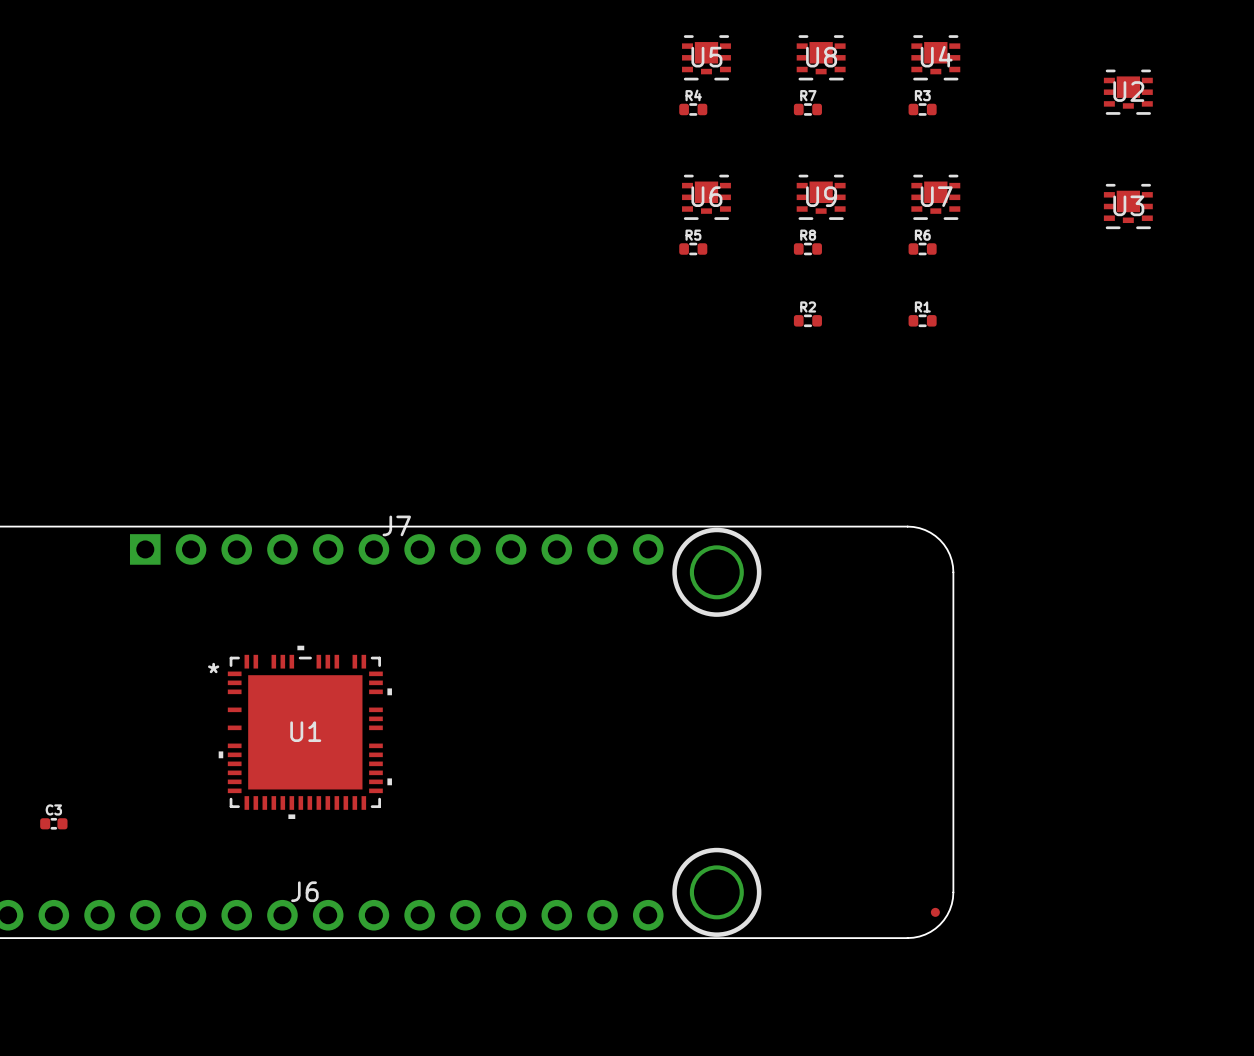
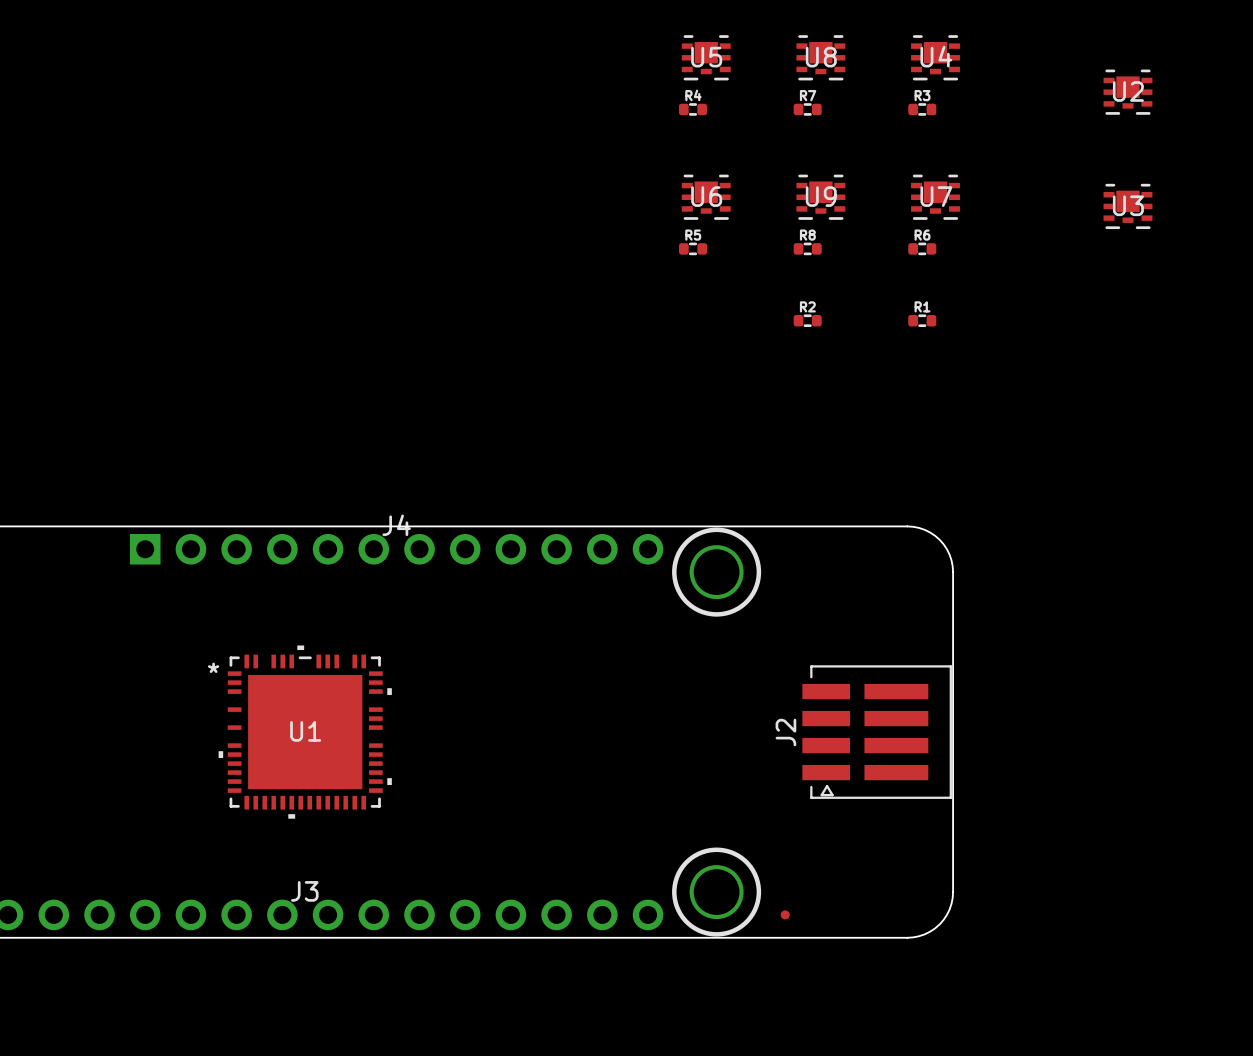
J7 name: J7 (396, 525) -> J4 (396, 525)
J2: none -> (877, 732)
C3: (53, 823) -> none
J6 name: J6 (304, 891) -> J3 (304, 891)
part position: (935, 912) -> (785, 914)

